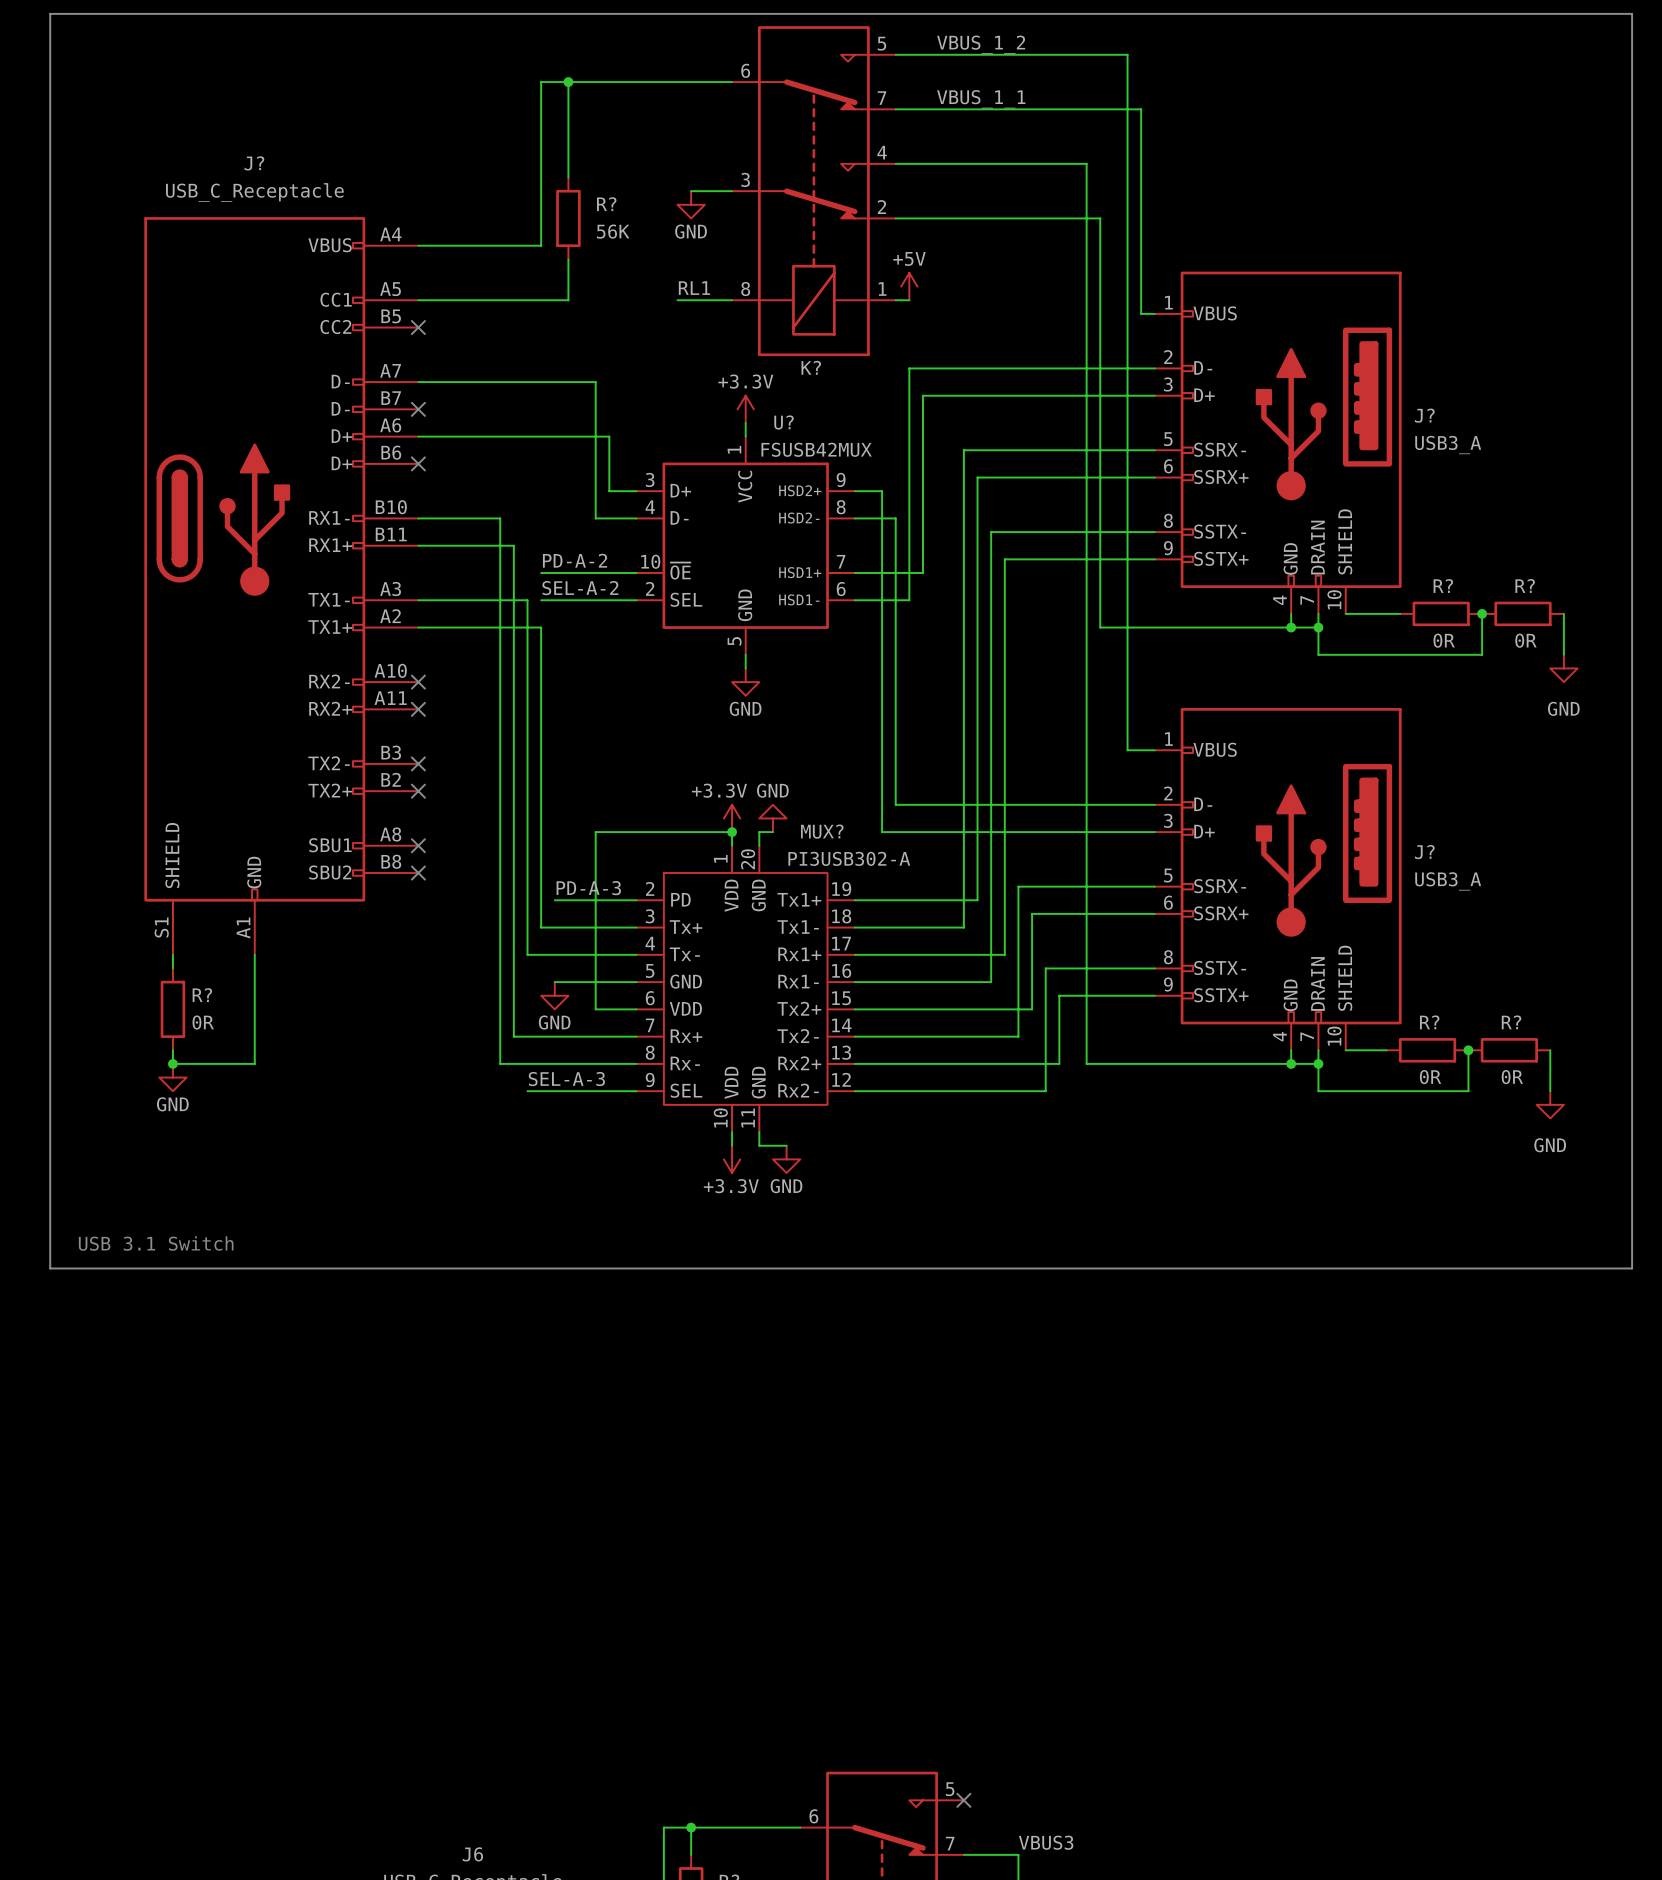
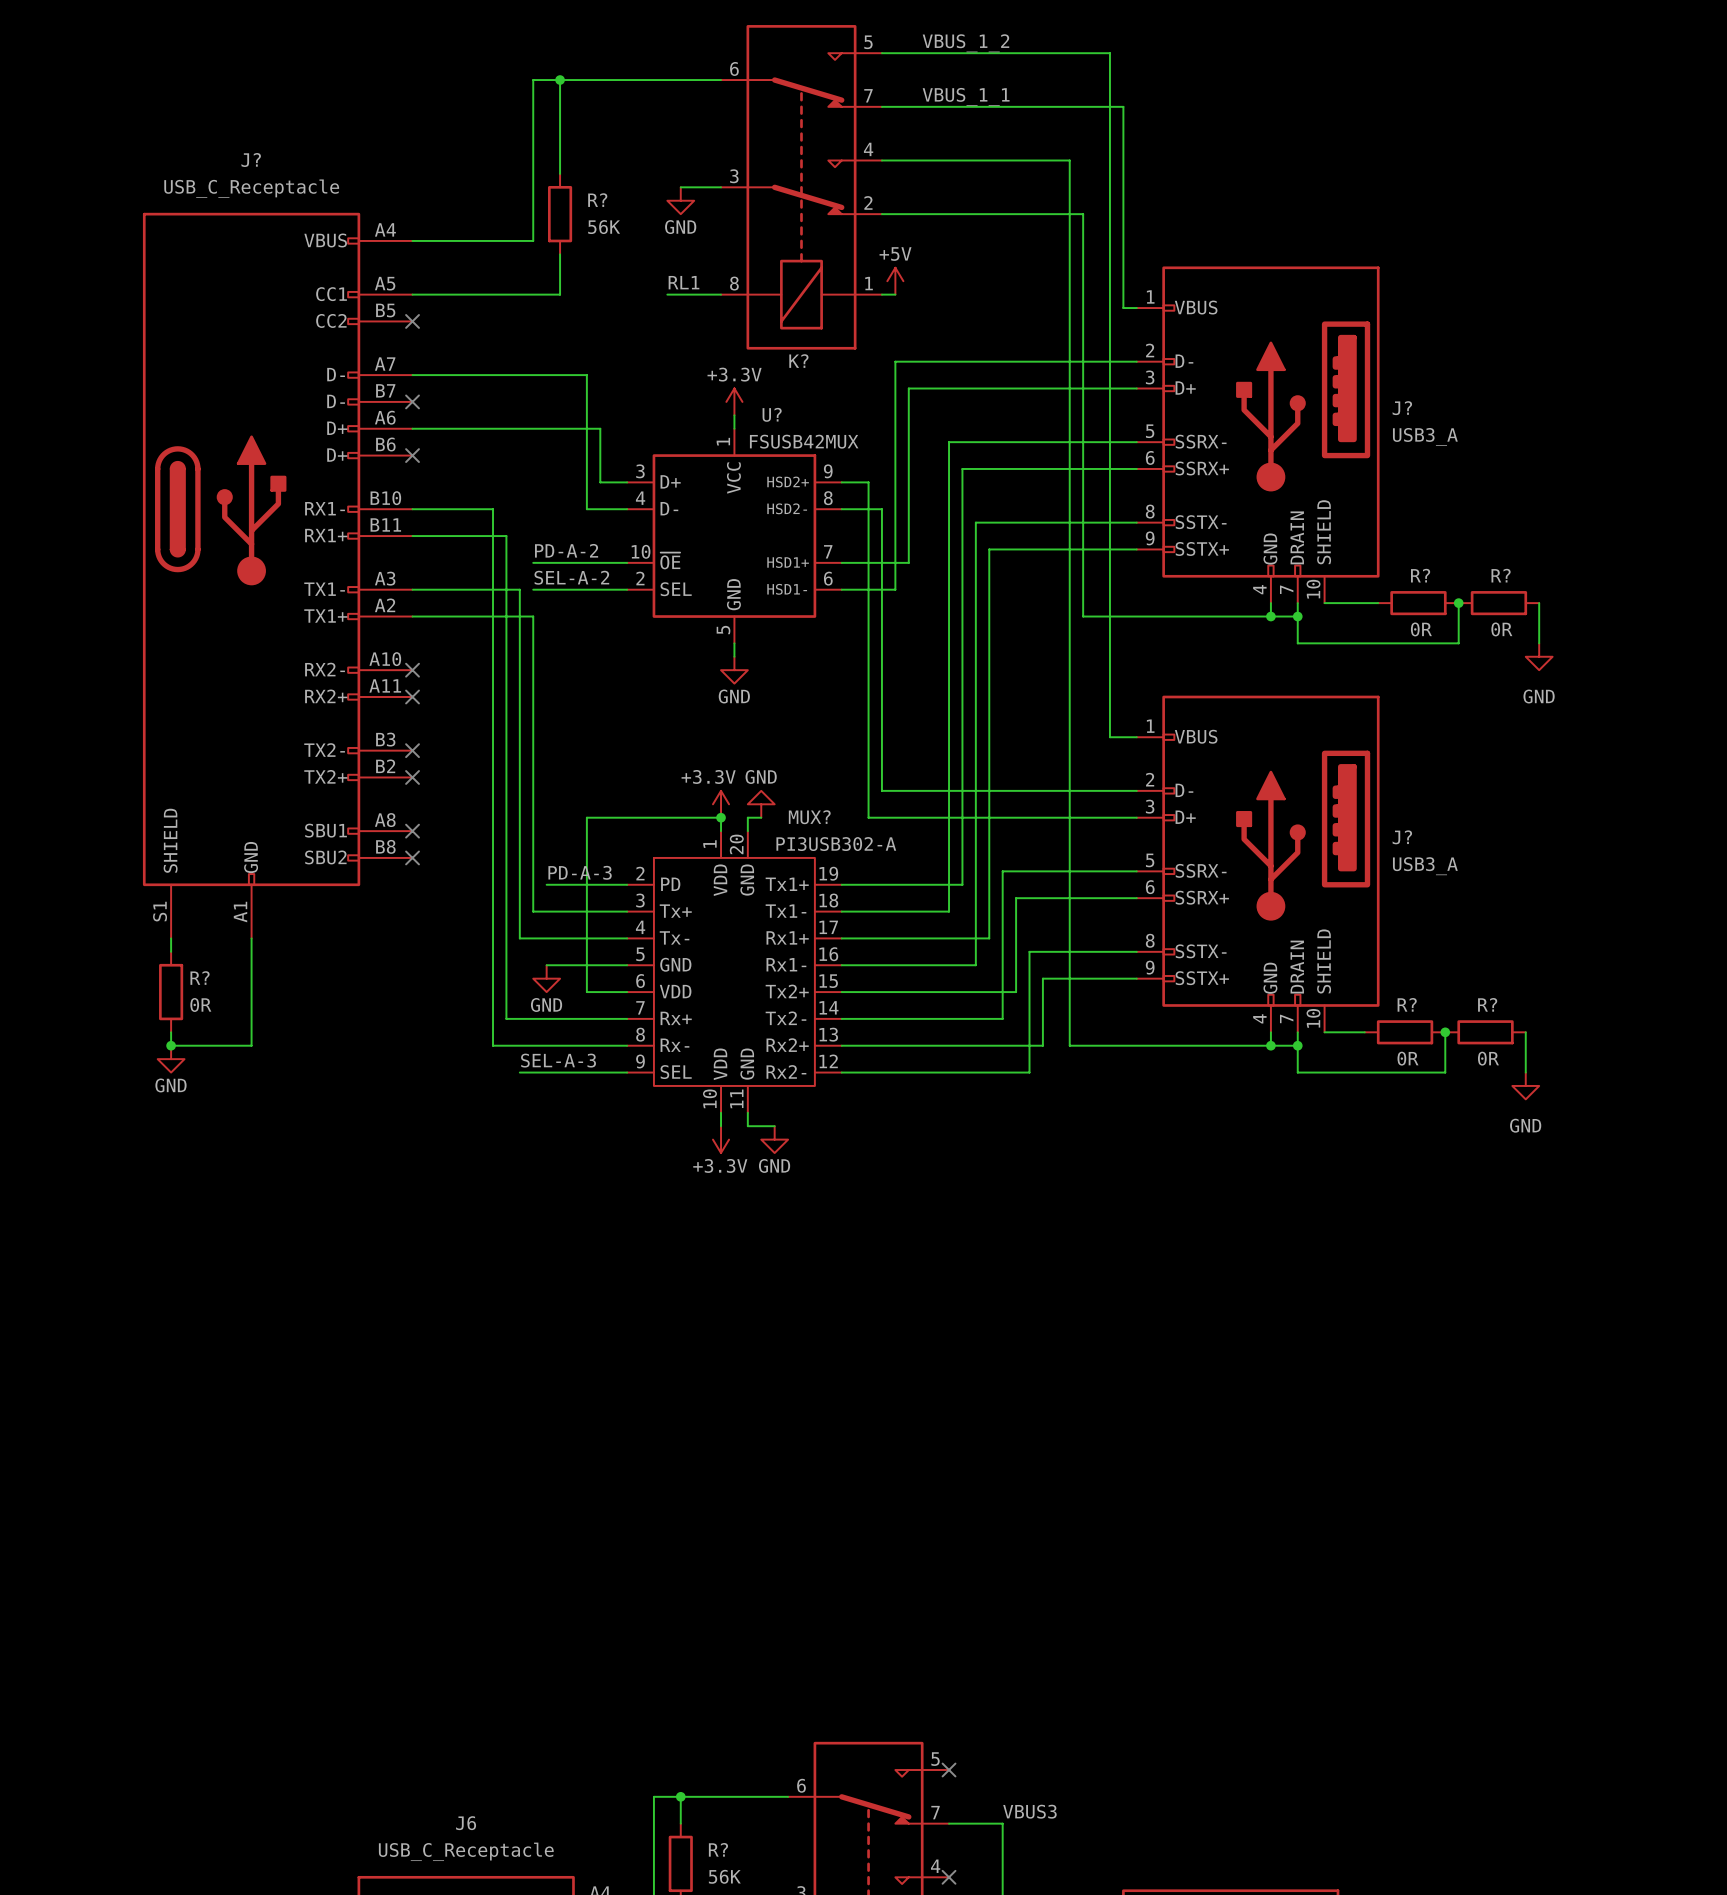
line: (50, 13) (50, 1268) (1632, 1268) (1632, 13) (50, 13) -> none
text: USB 3.1 Switch (156, 1243) -> none

